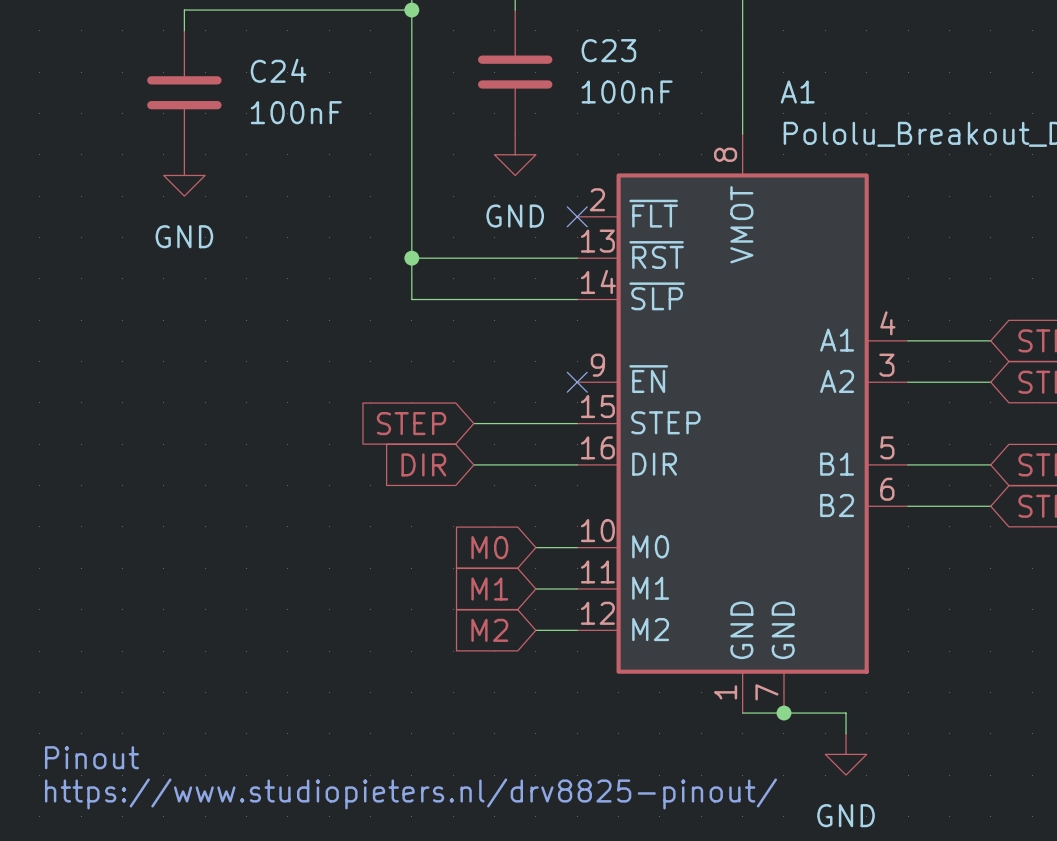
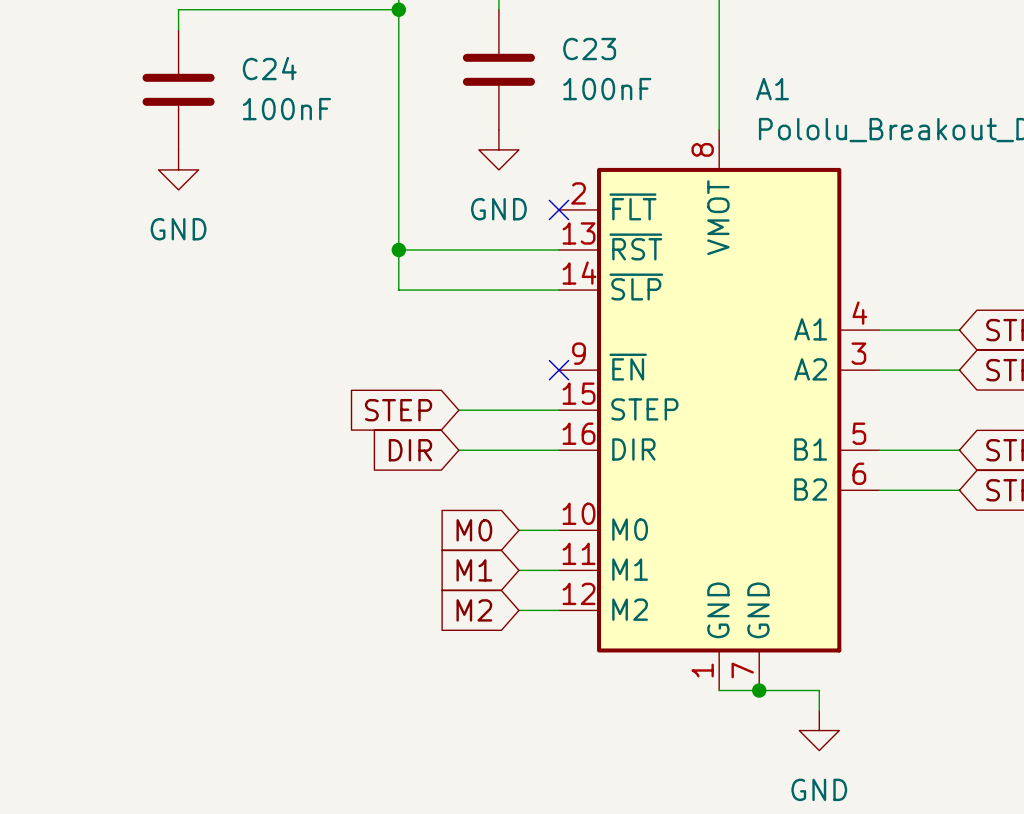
text: Pinout (91, 757) -> none
text: https://www.studiopieters.nl/drv8825-pinout/ (410, 793) -> none

